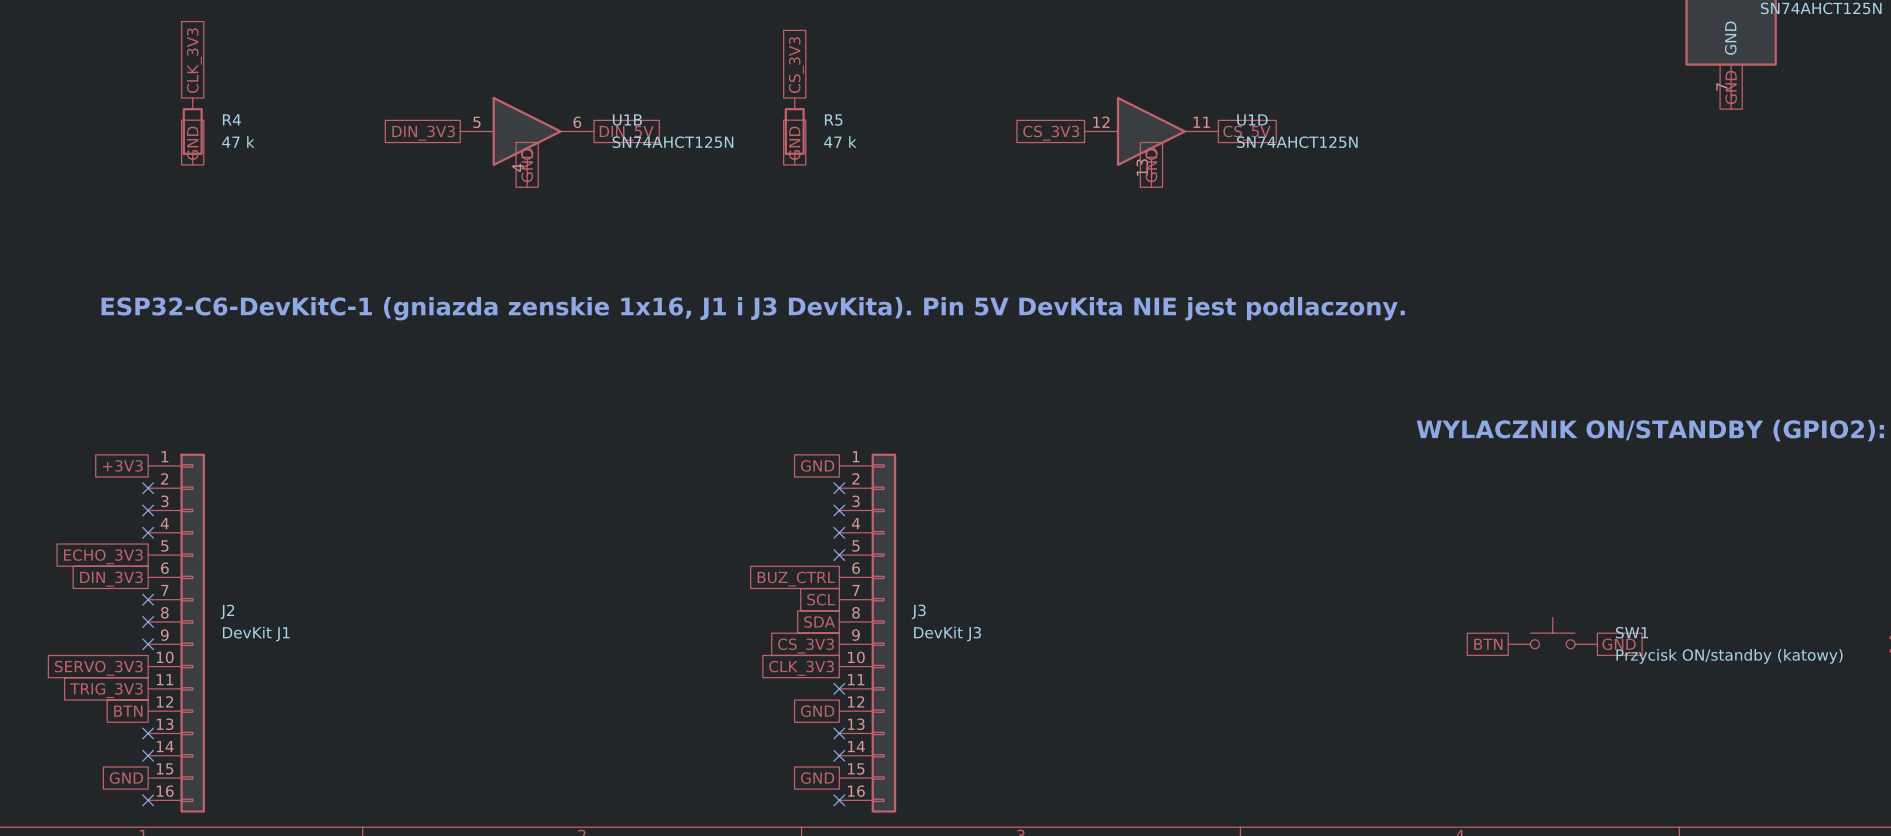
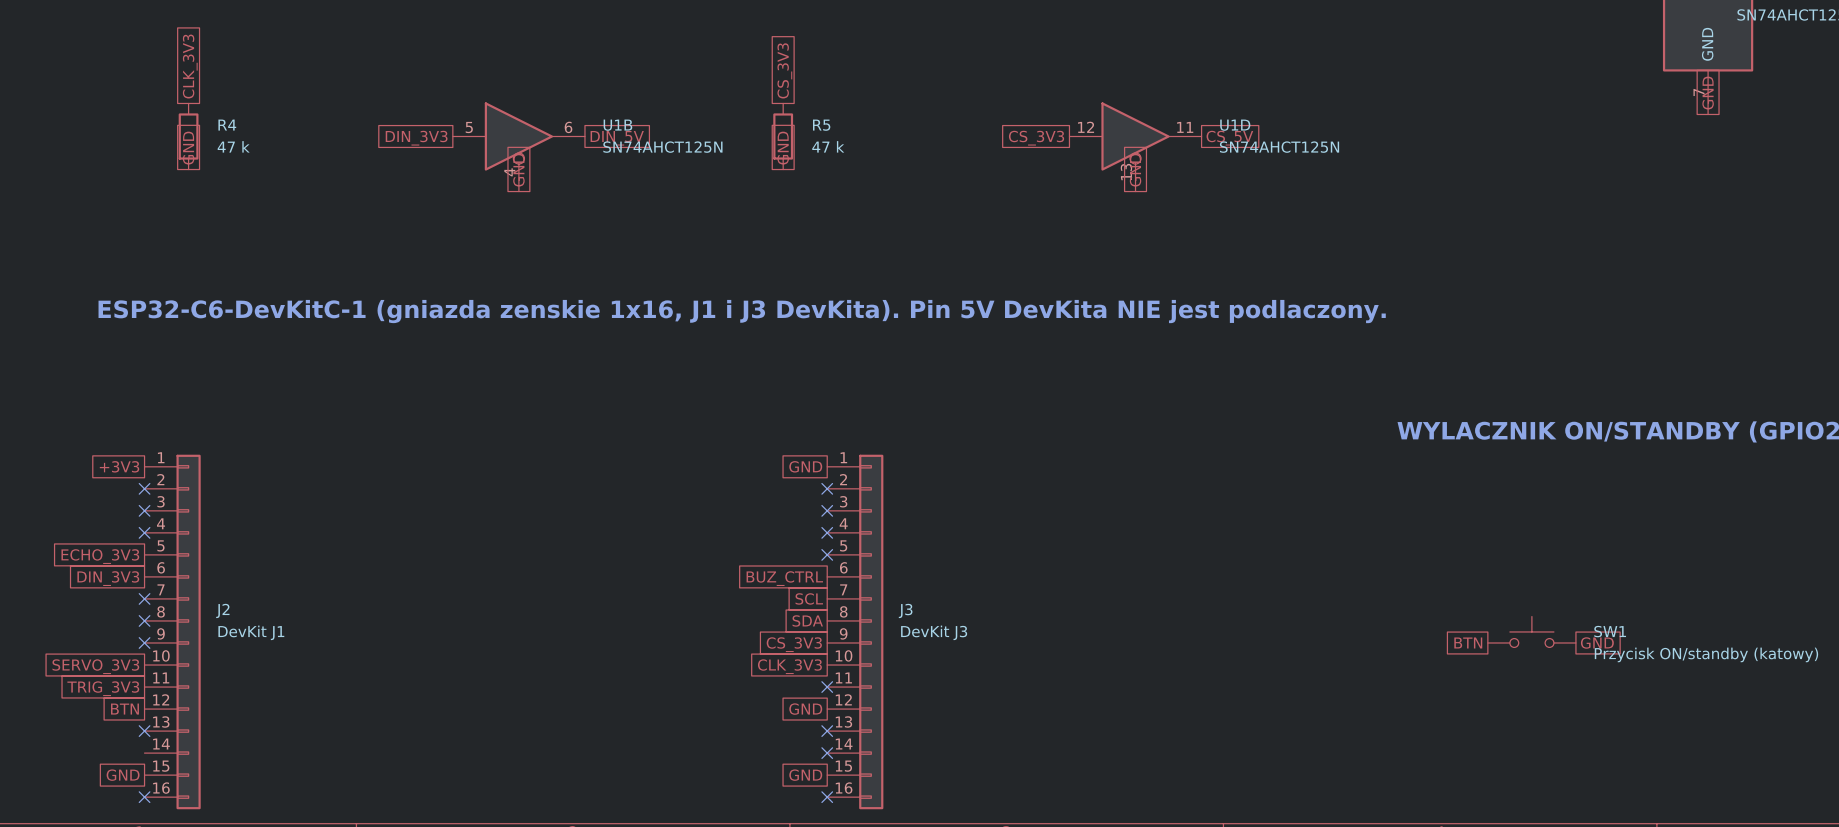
no-connect mark: (148, 755) -> none

